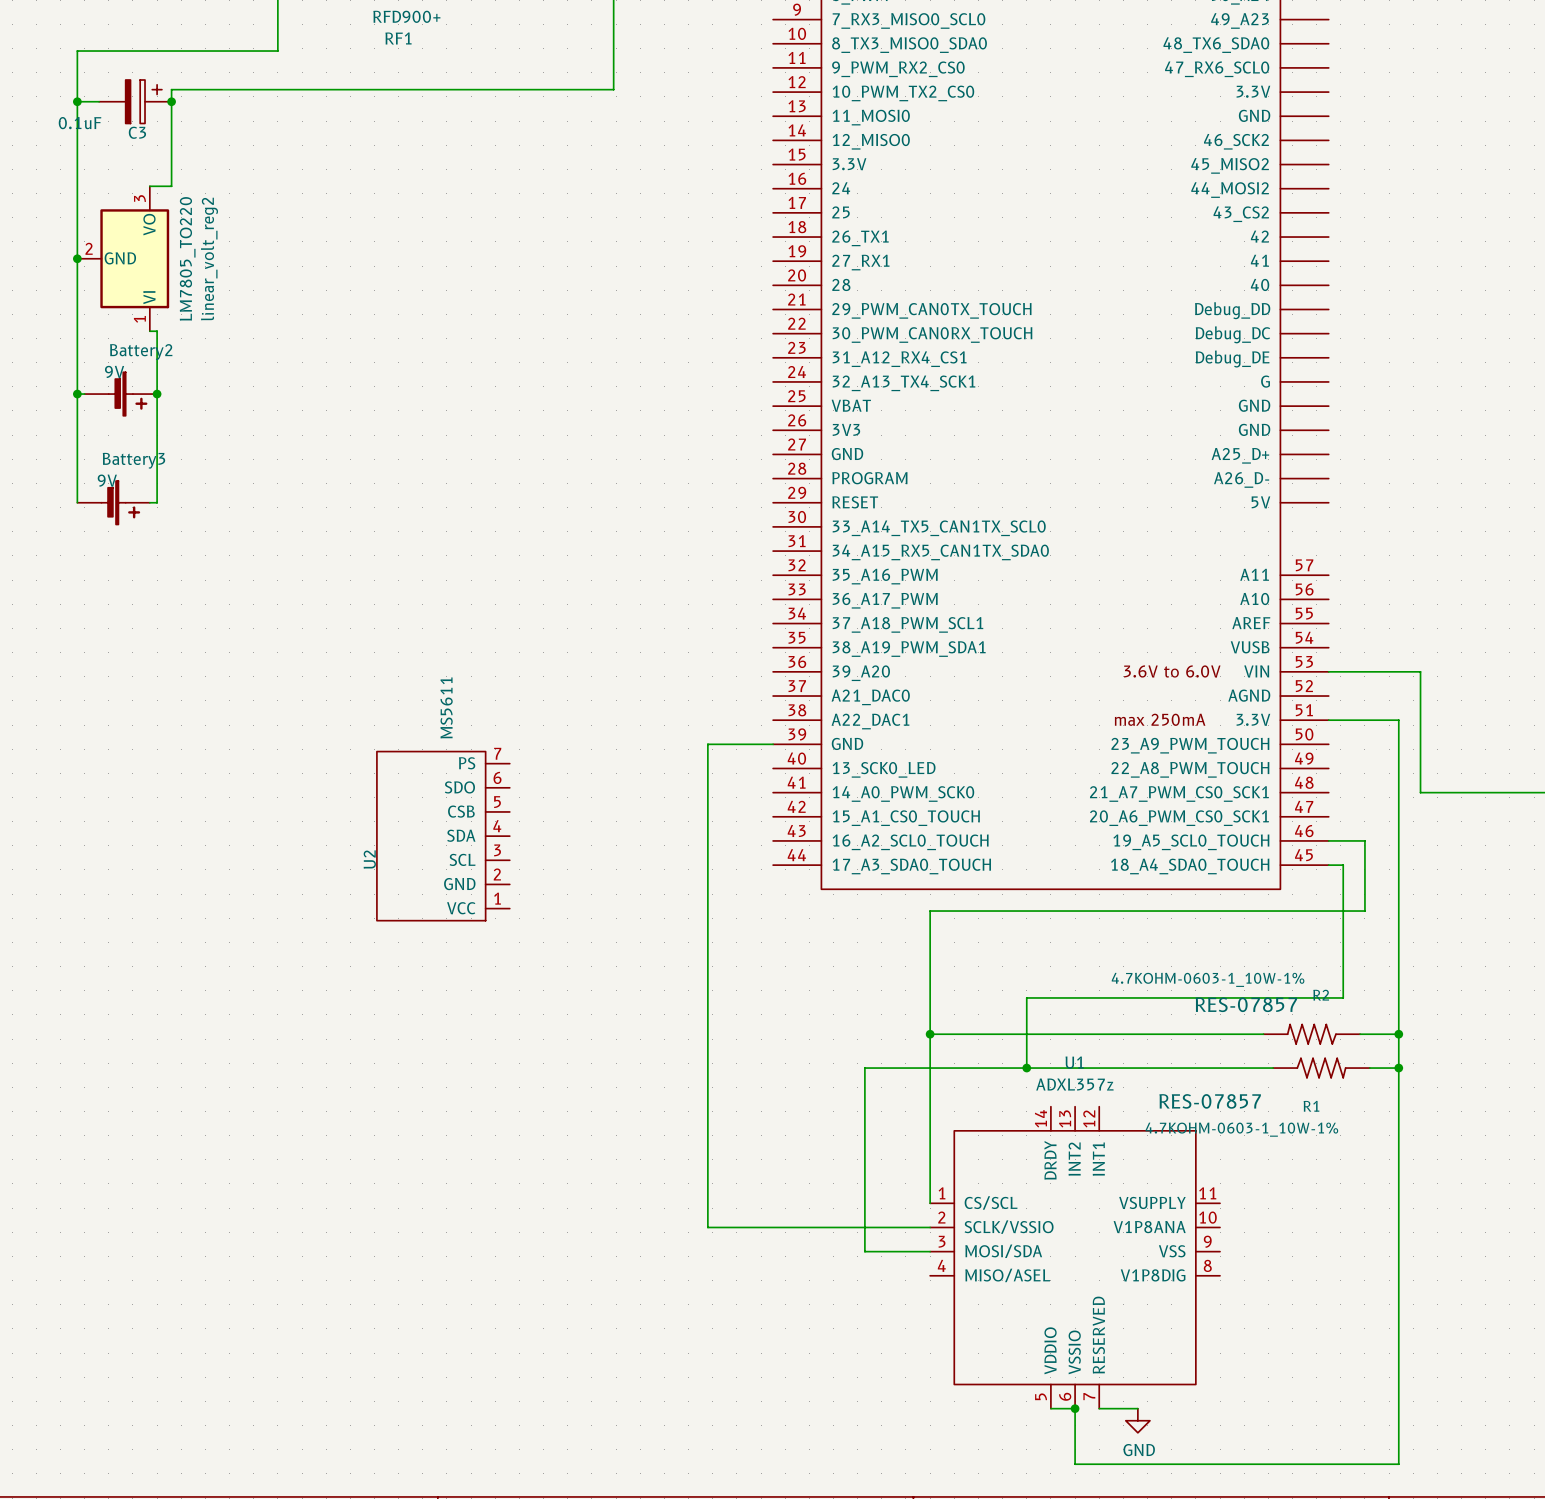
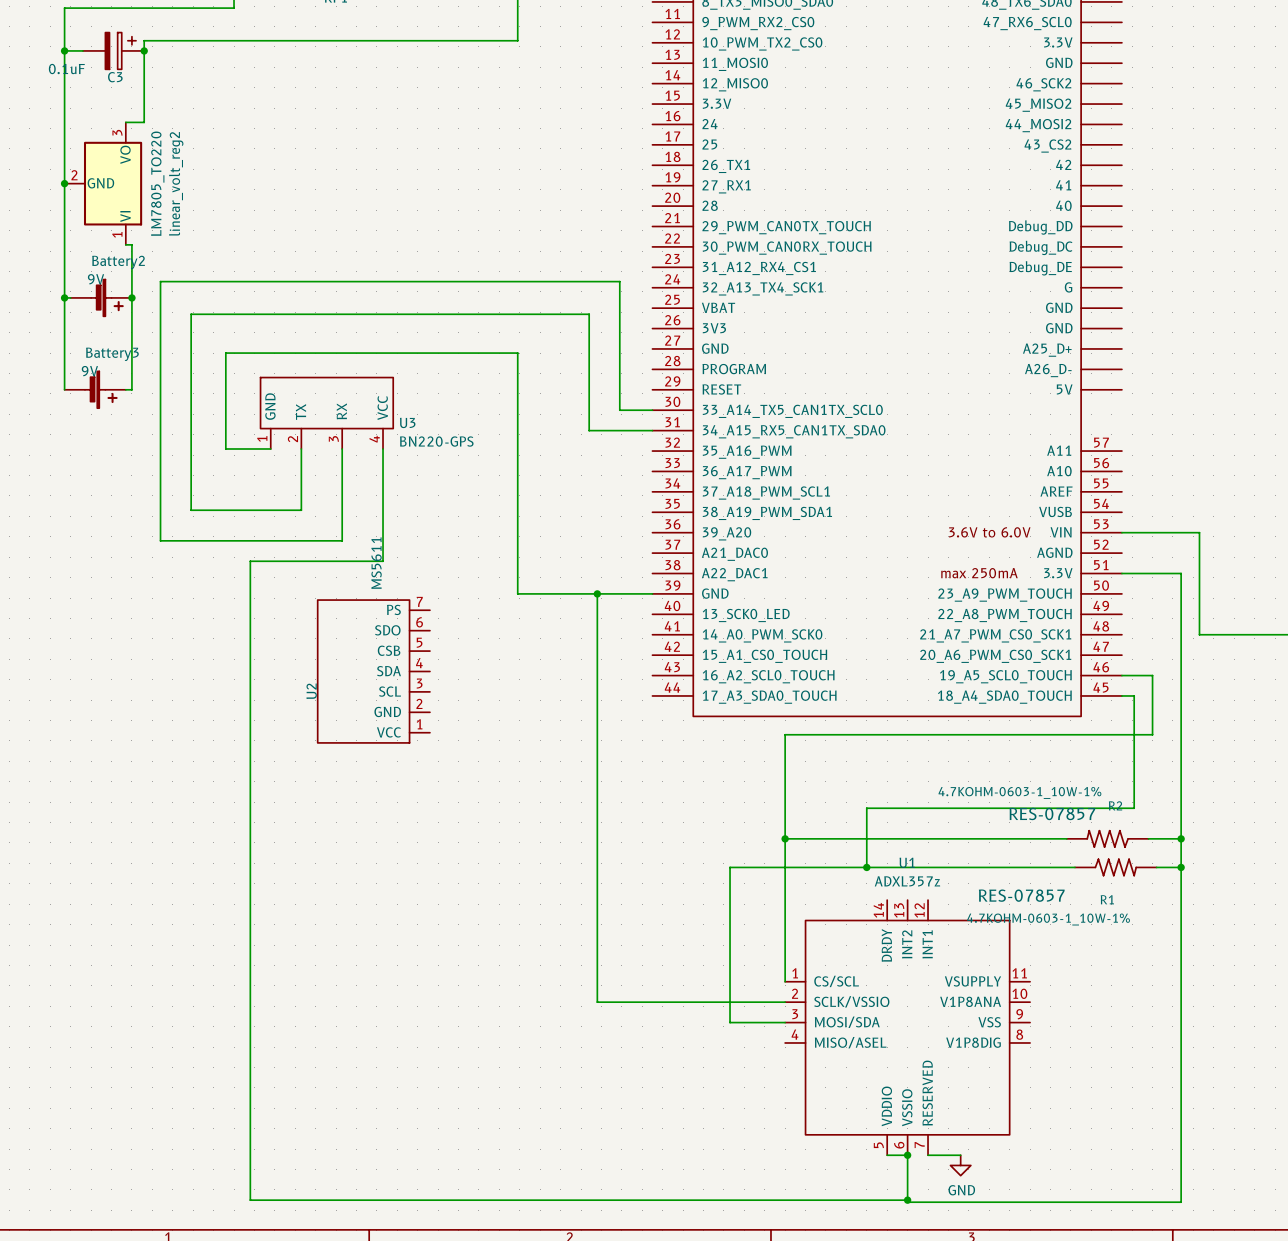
wire: none -> (652, 410) (619, 410) (619, 281) (160, 281) (160, 540) (342, 540) (342, 448)
U3: none -> BN220-GPS (326, 413)
wire: none -> (652, 430) (589, 430) (589, 314) (191, 314) (191, 510) (301, 510) (301, 448)
wire: none -> (270, 448) (225, 448) (225, 353) (517, 353) (517, 593) (597, 593)
wire: none -> (383, 448) (383, 561) (250, 561) (250, 1200) (907, 1200)
junction: none -> (597, 593)
junction: none -> (907, 1200)

